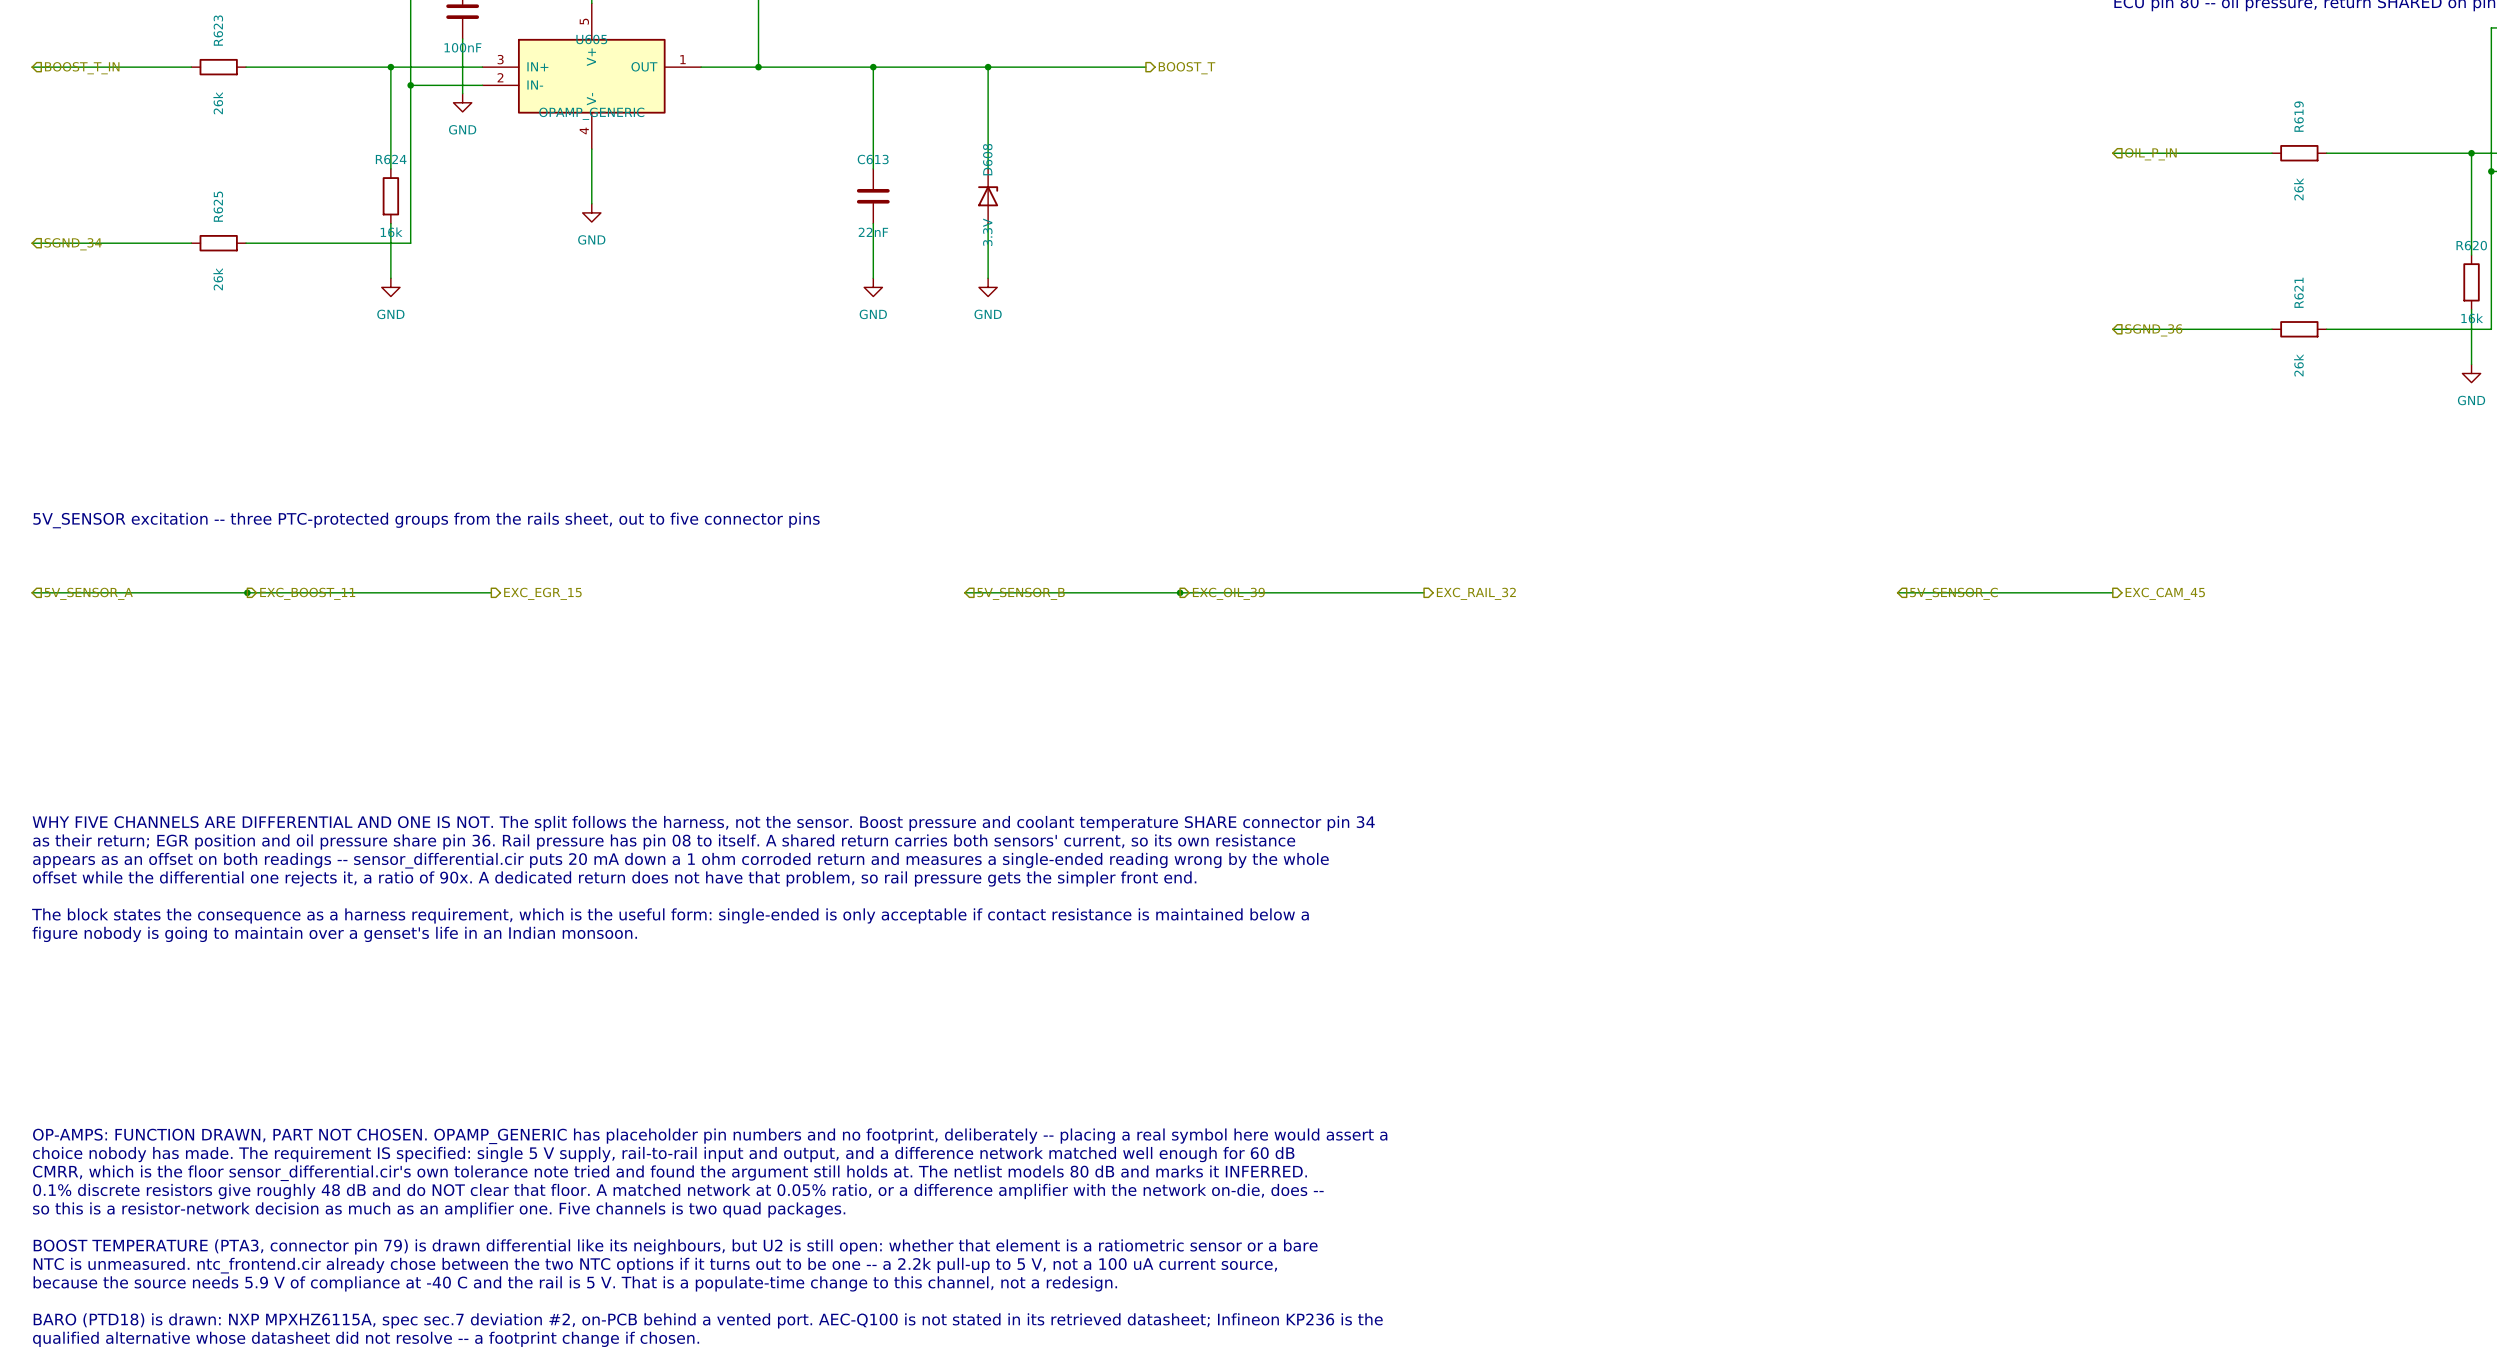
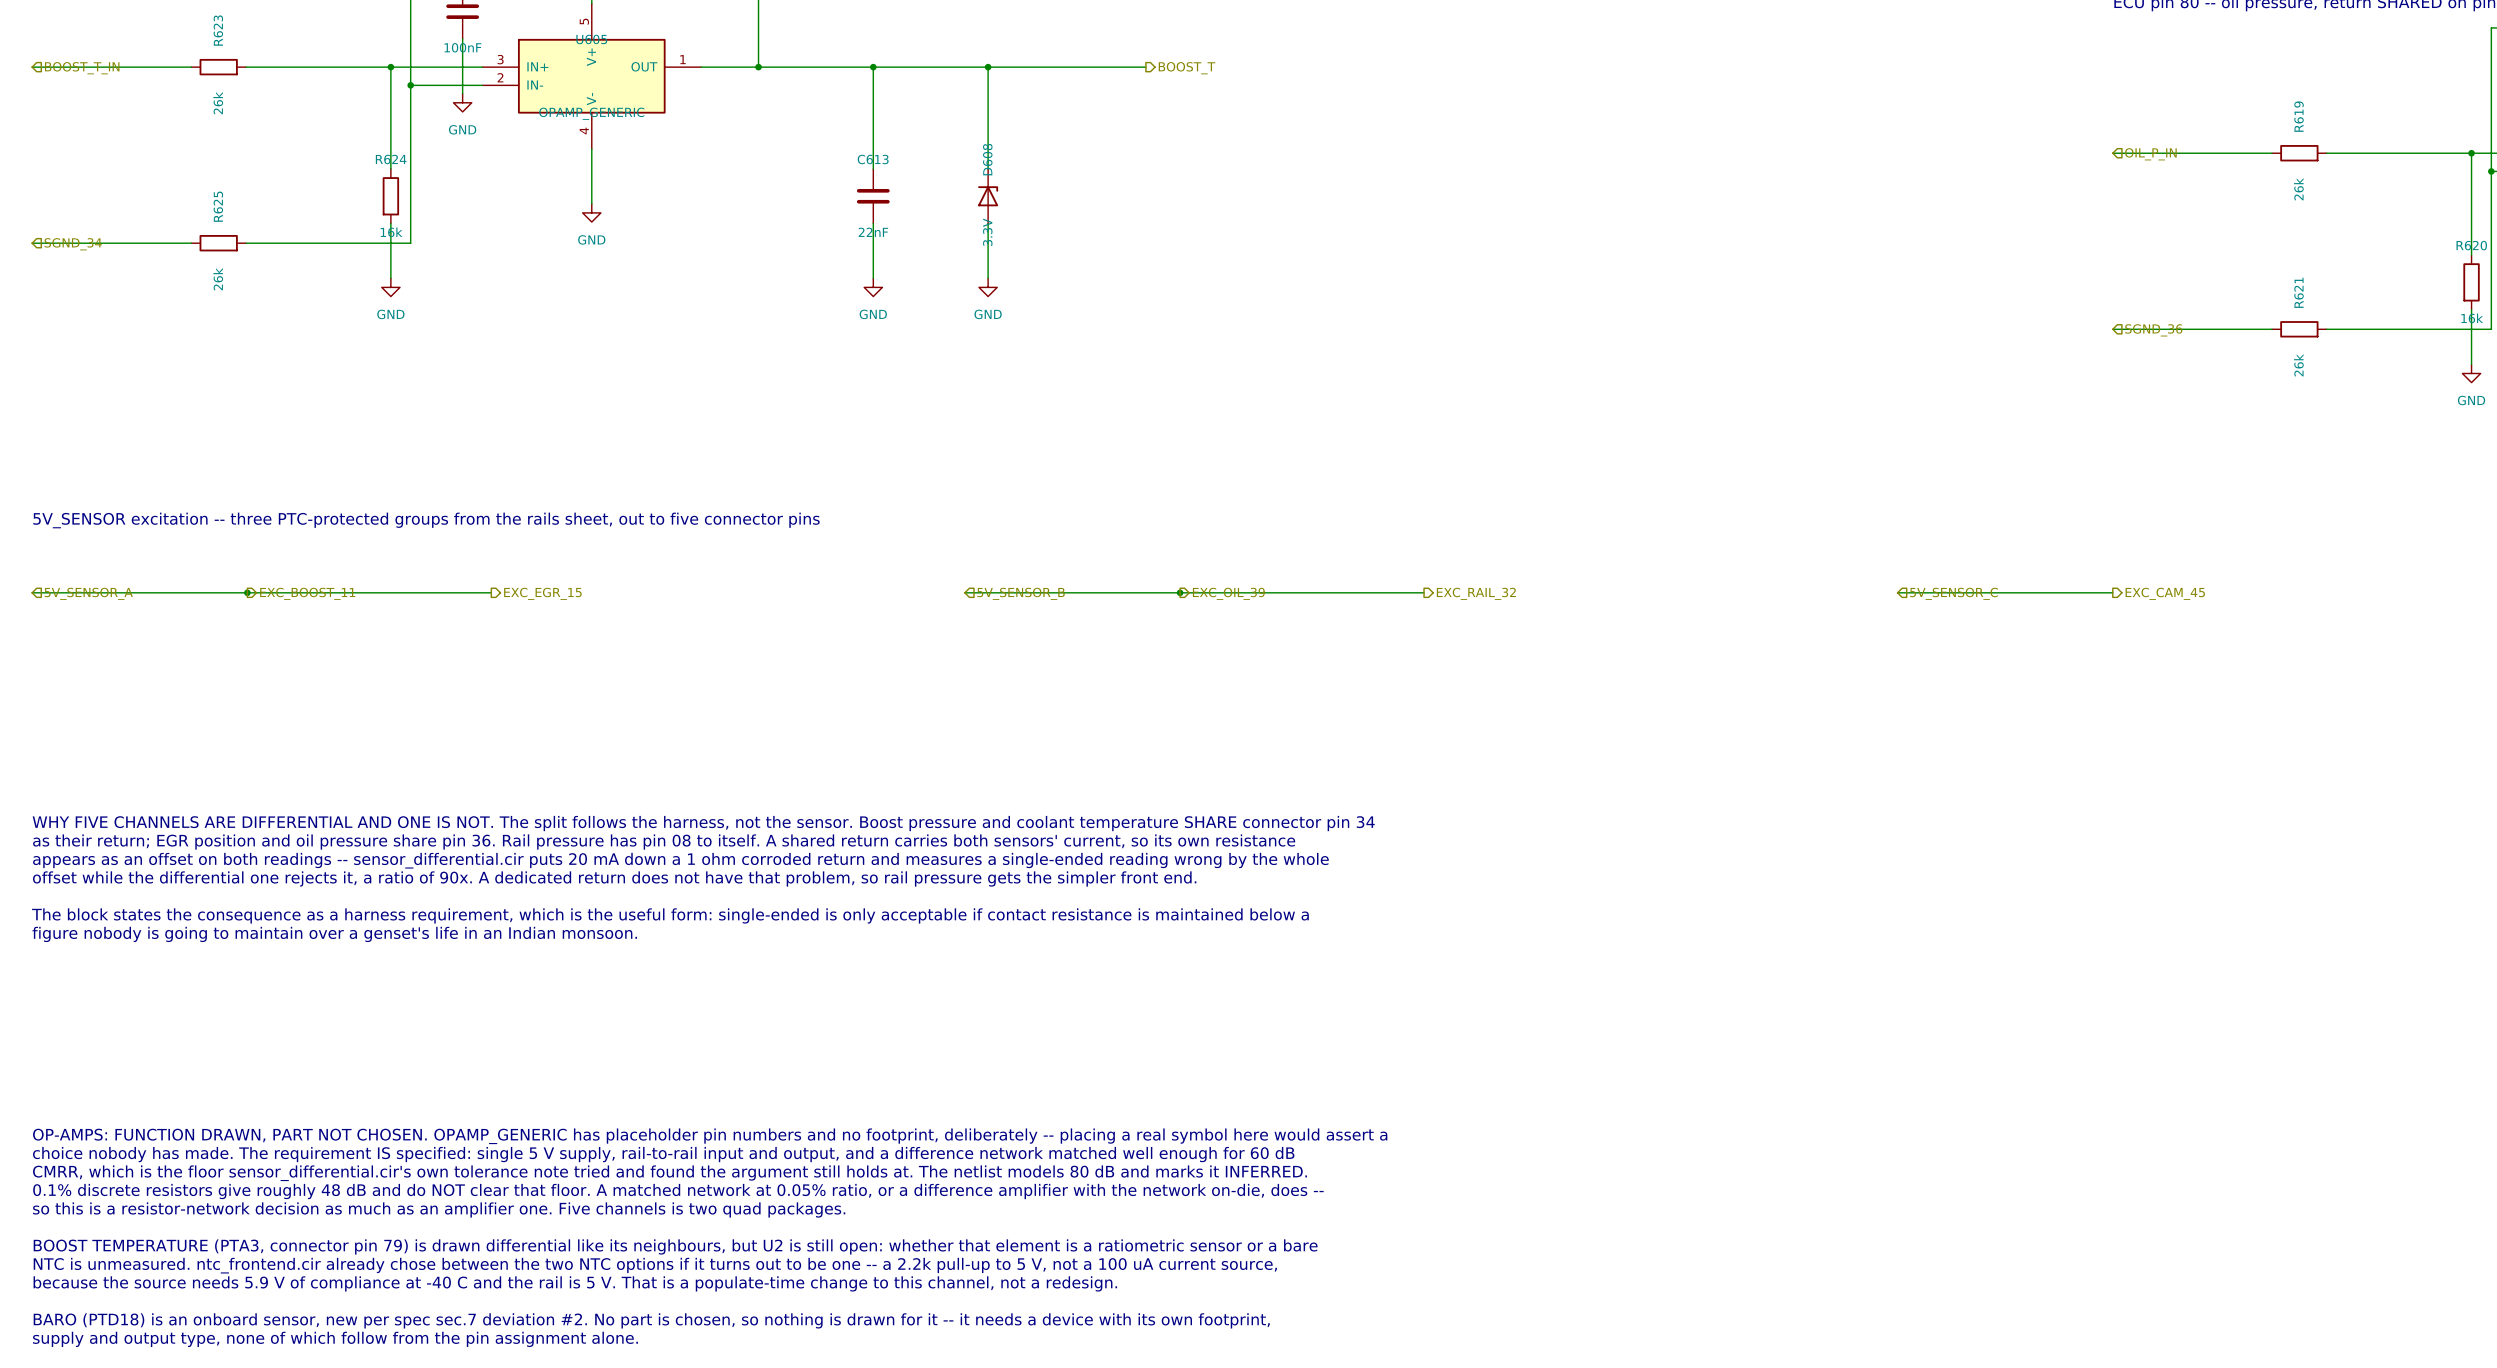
text: BARO (PTD18) is drawn: NXP MPXHZ6115A, spec sec.7 deviation #2, on-PCB behind a vented port. AEC-Q100 is not stated in its retrieved datasheet; Infineon KP236 is the (708, 1320) -> BARO (PTD18) is an onboard sensor, new per spec sec.7 deviation #2. No part is chosen, so nothing is drawn for it -- it needs a device with its own footprint, (651, 1320)
text: qualified alternative whose datasheet did not resolve -- a footprint change if chosen. (366, 1339) -> supply and output type, none of which follow from the pin assignment alone. (335, 1339)

